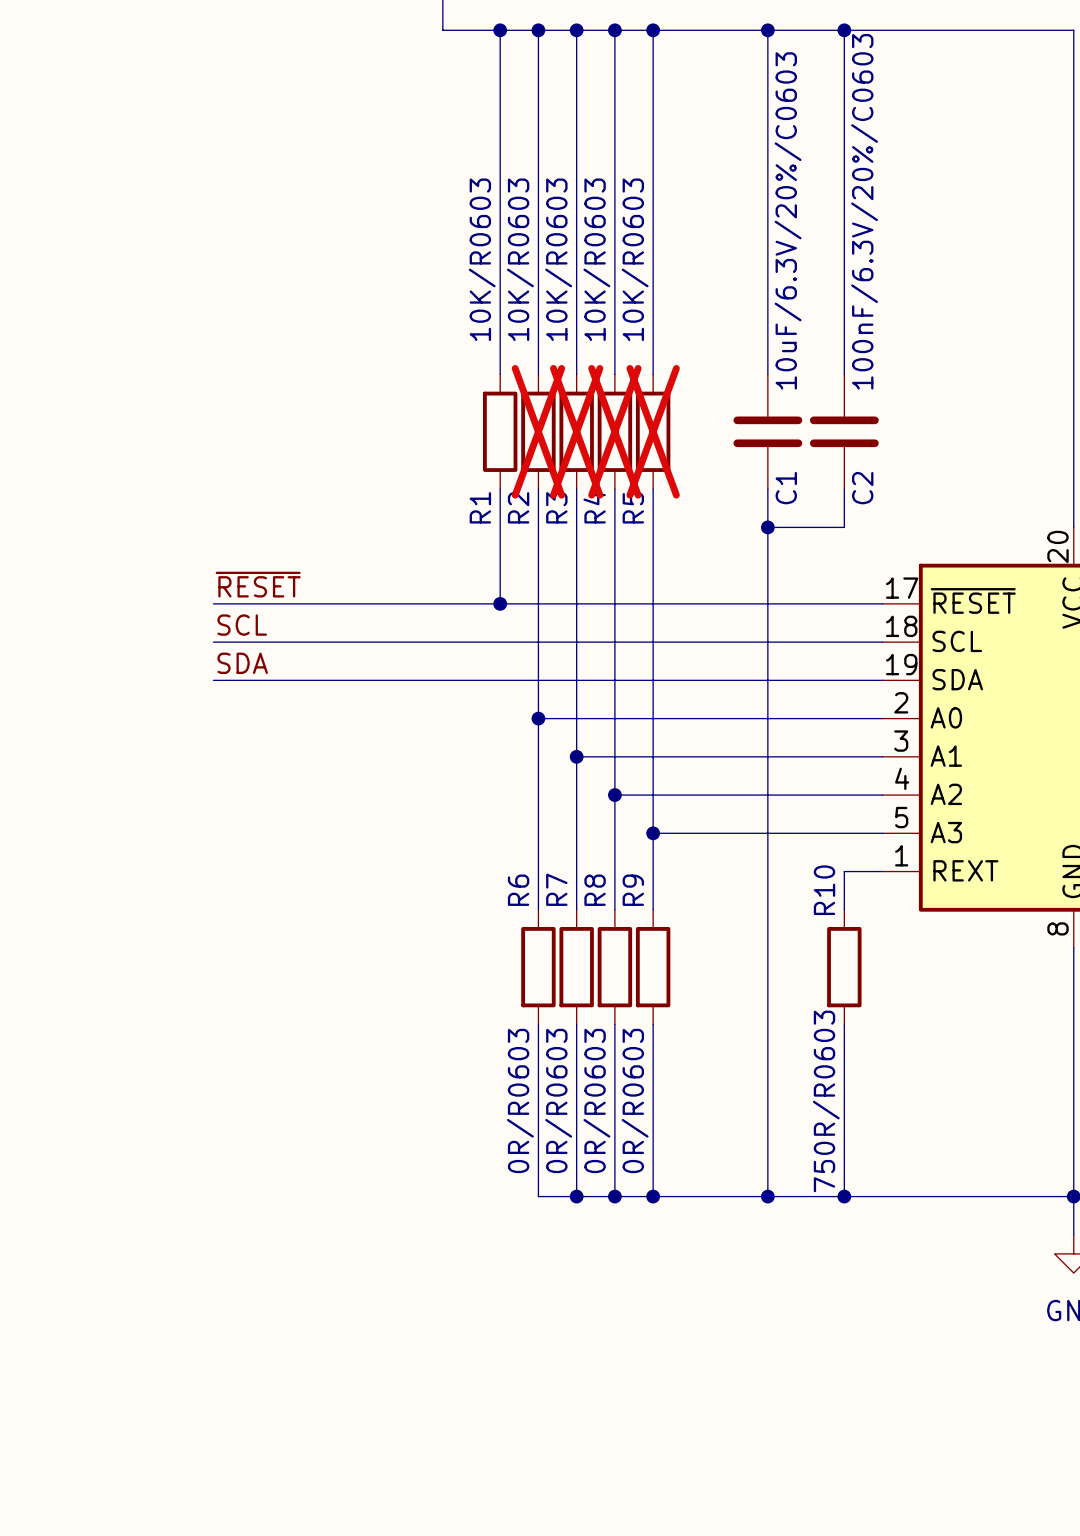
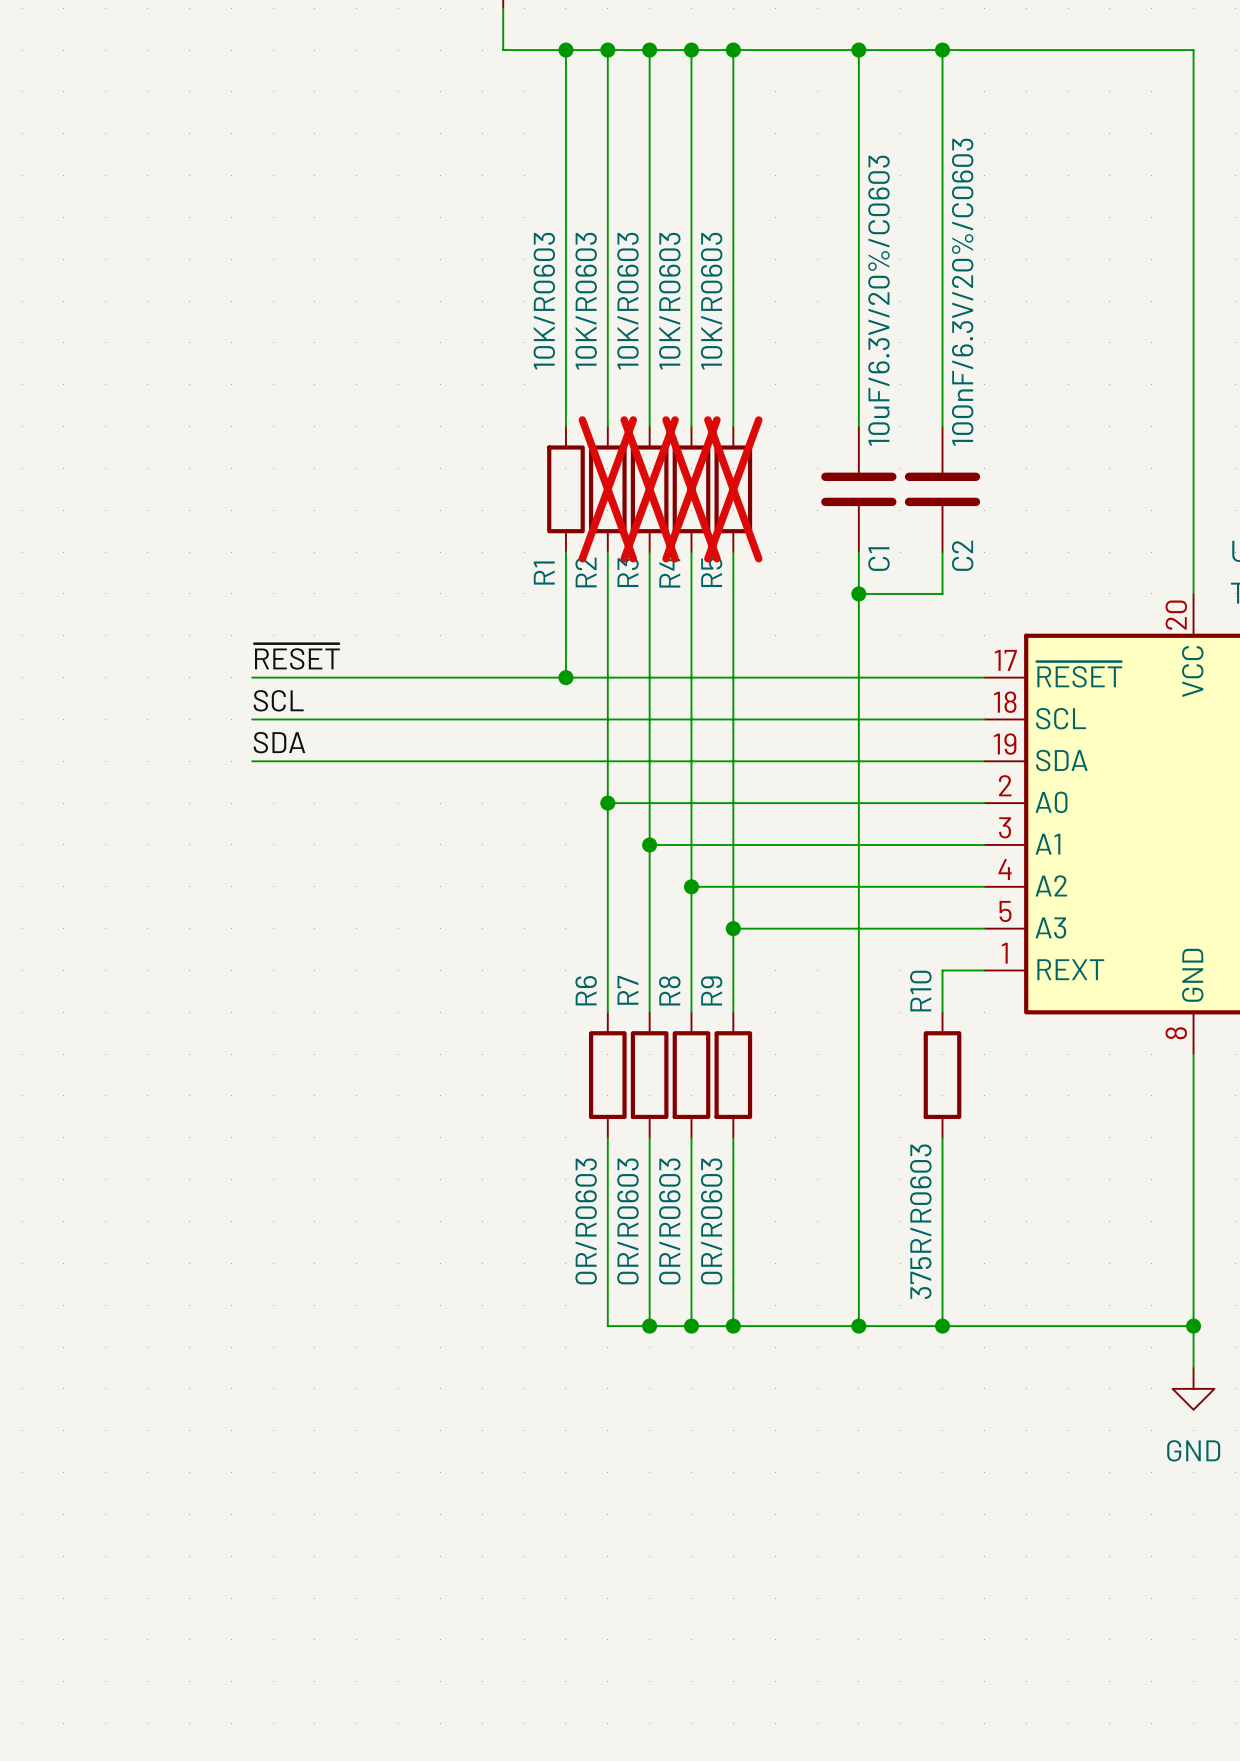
R10 value: 750R/R0603 (826, 1101) -> 375R/R0603 (920, 1221)

